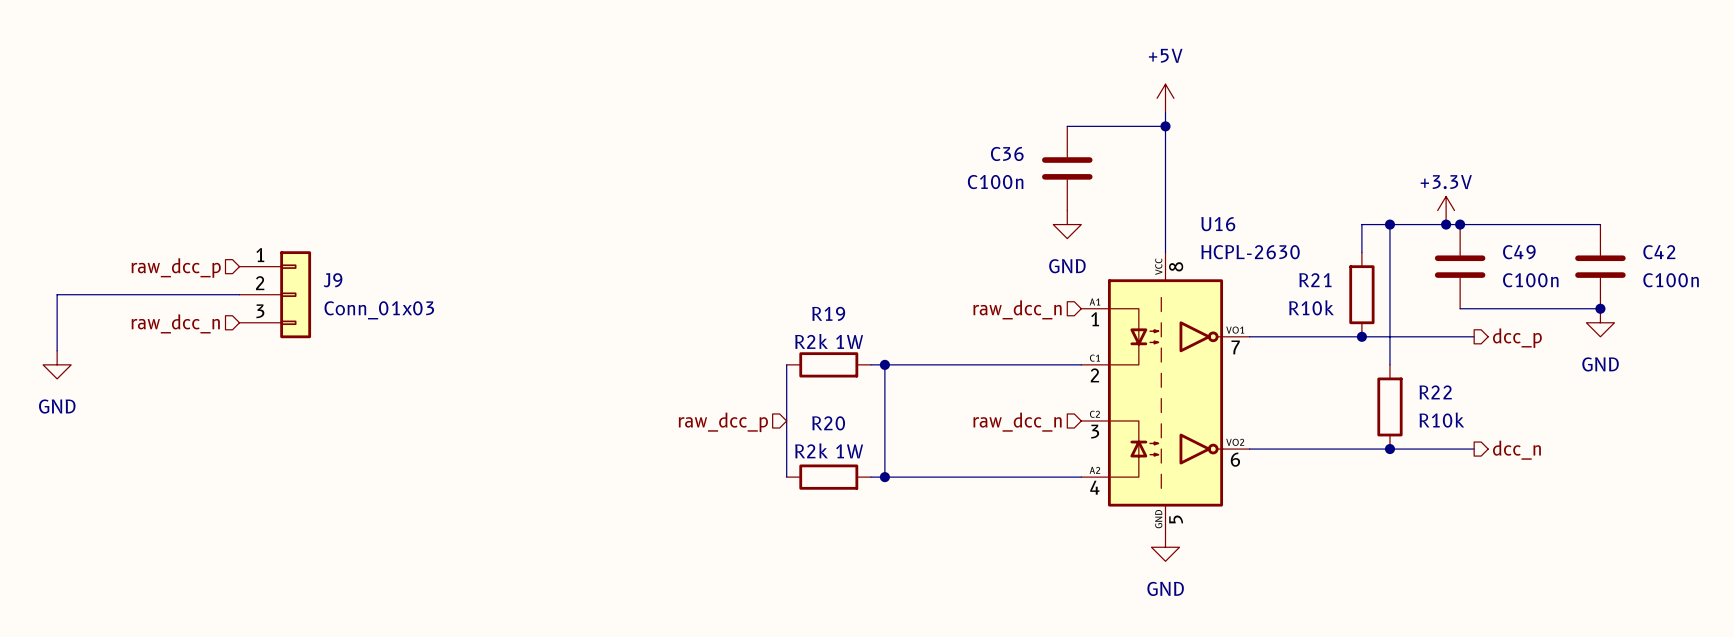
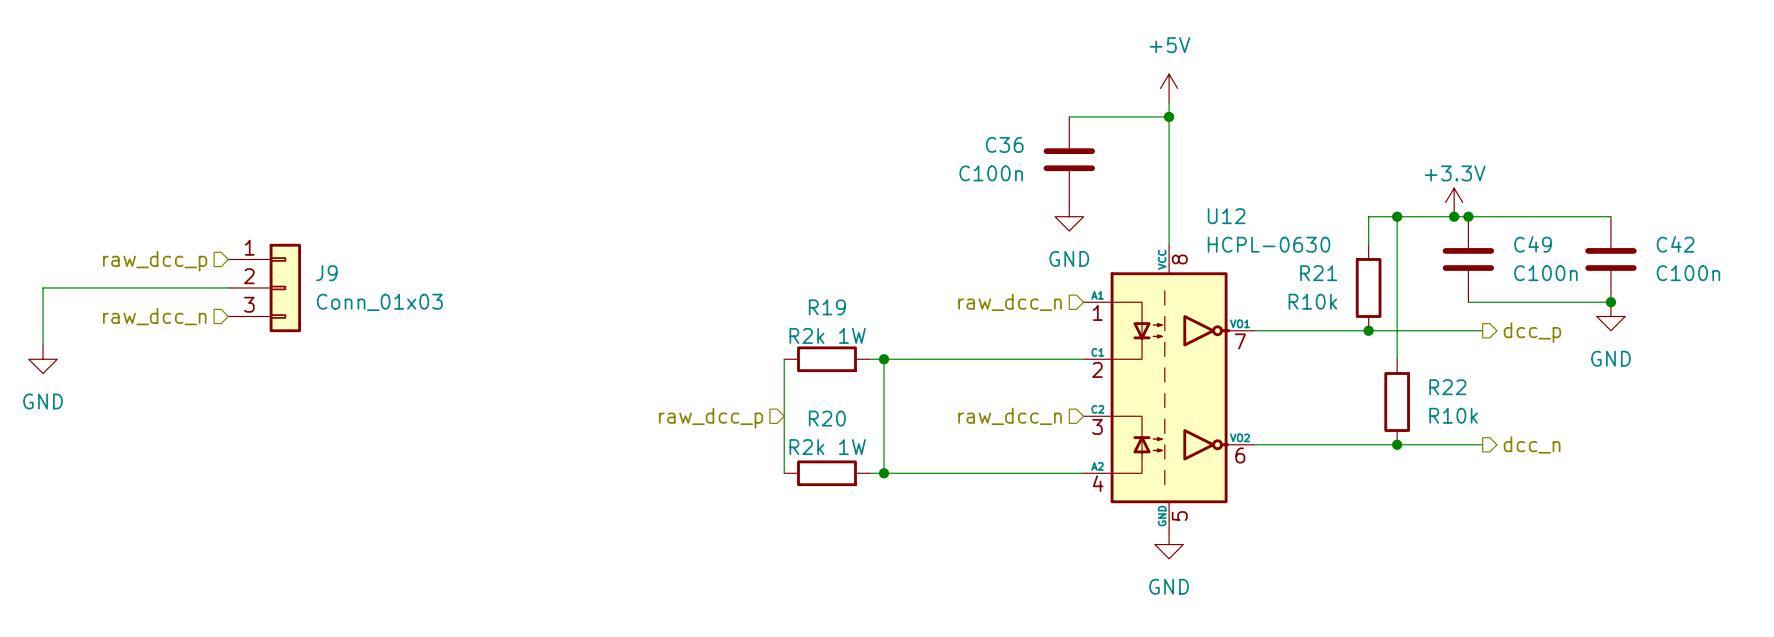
U16: HCPL-2630 (1165, 392) -> none
U12: none -> HCPL-0630 (1169, 387)

